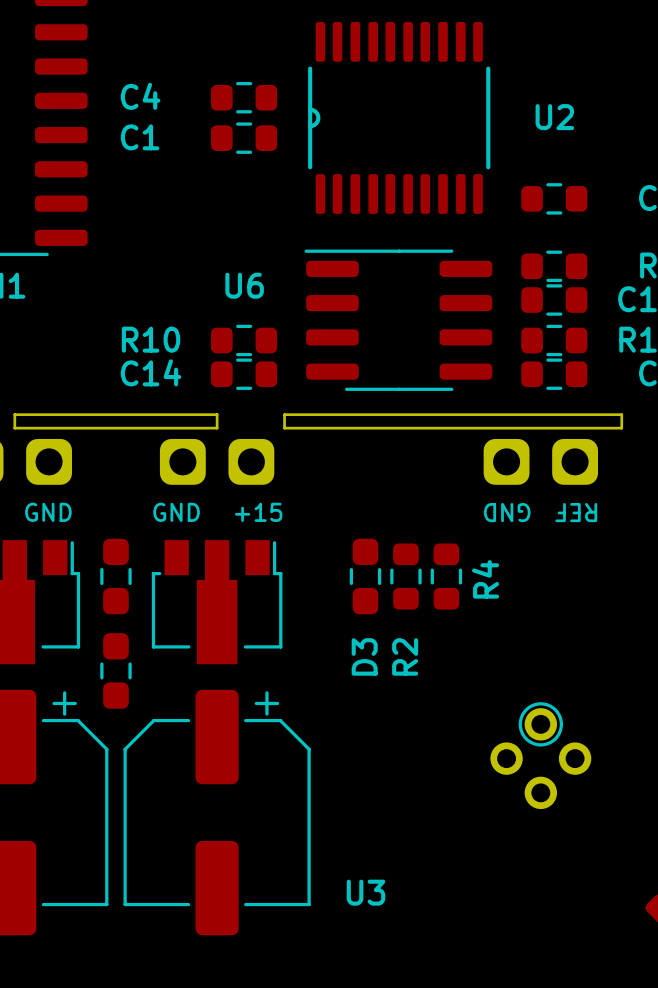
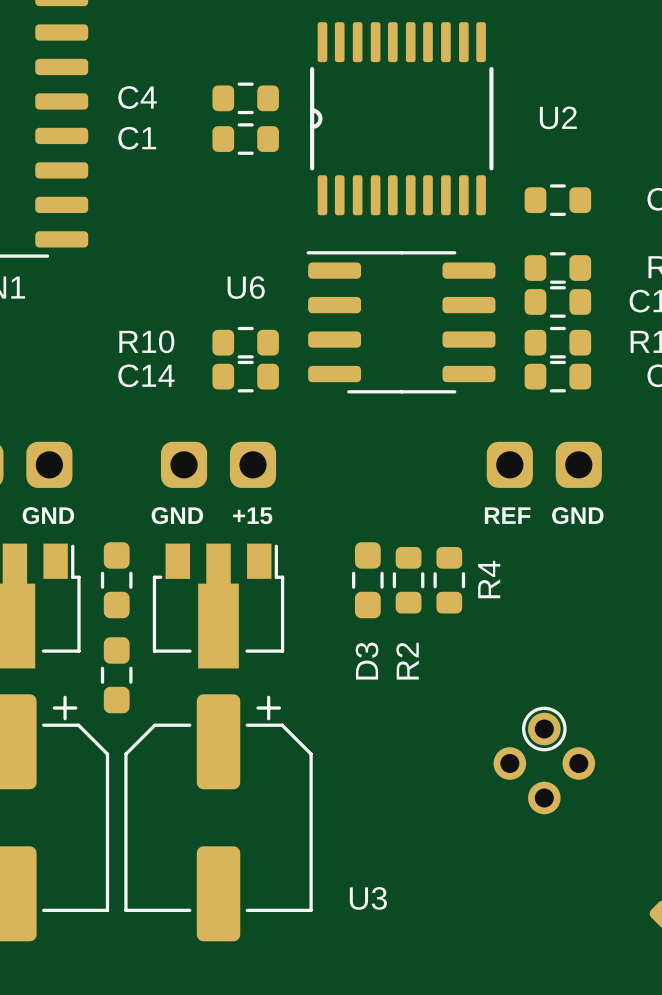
board edge: (14, 414) (217, 414) (217, 428) (14, 428) (14, 414) -> none
board edge: (284, 414) (621, 414) (621, 428) (284, 428) (284, 414) -> none
text rotation: 0° (507, 512) -> 180° (577, 515)
text position: GND (507, 512) -> GND (577, 515)
part value rotation: 0° (576, 512) -> 180° (507, 515)
part value position: REF (576, 512) -> REF (507, 515)

